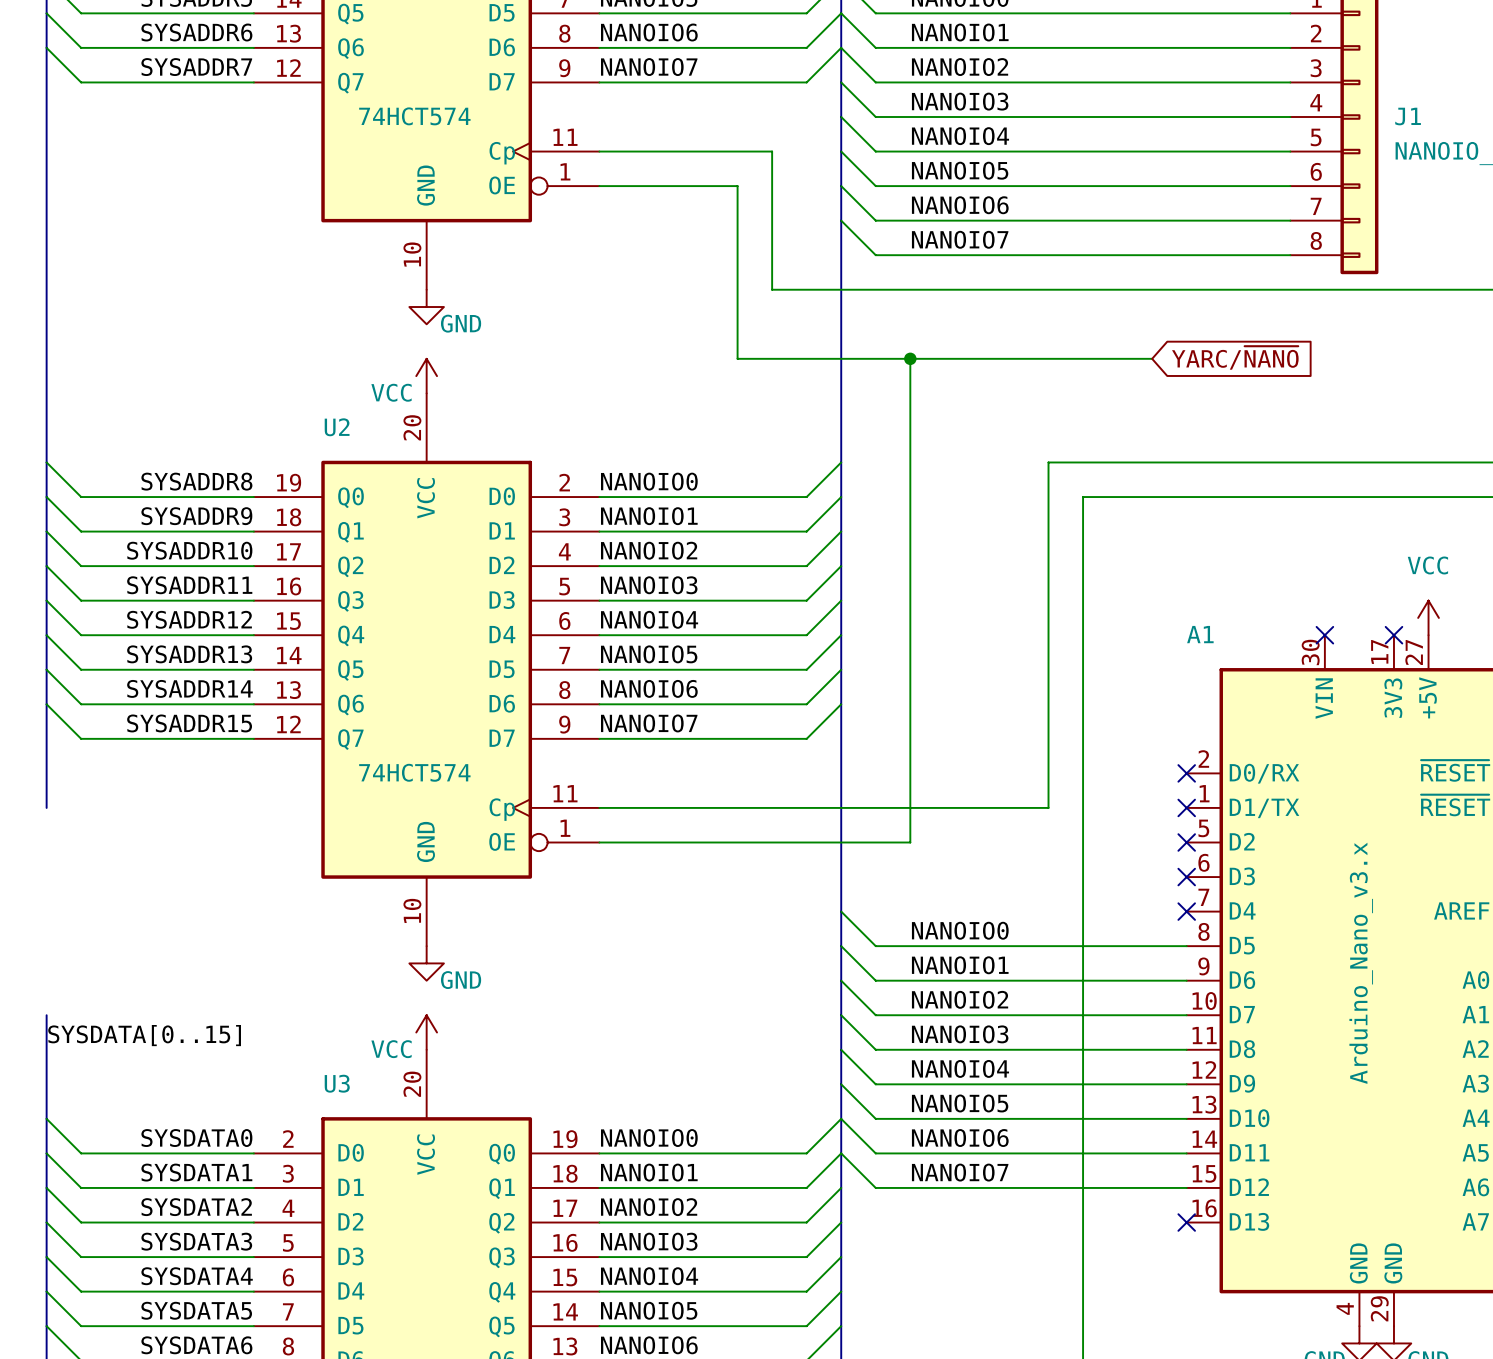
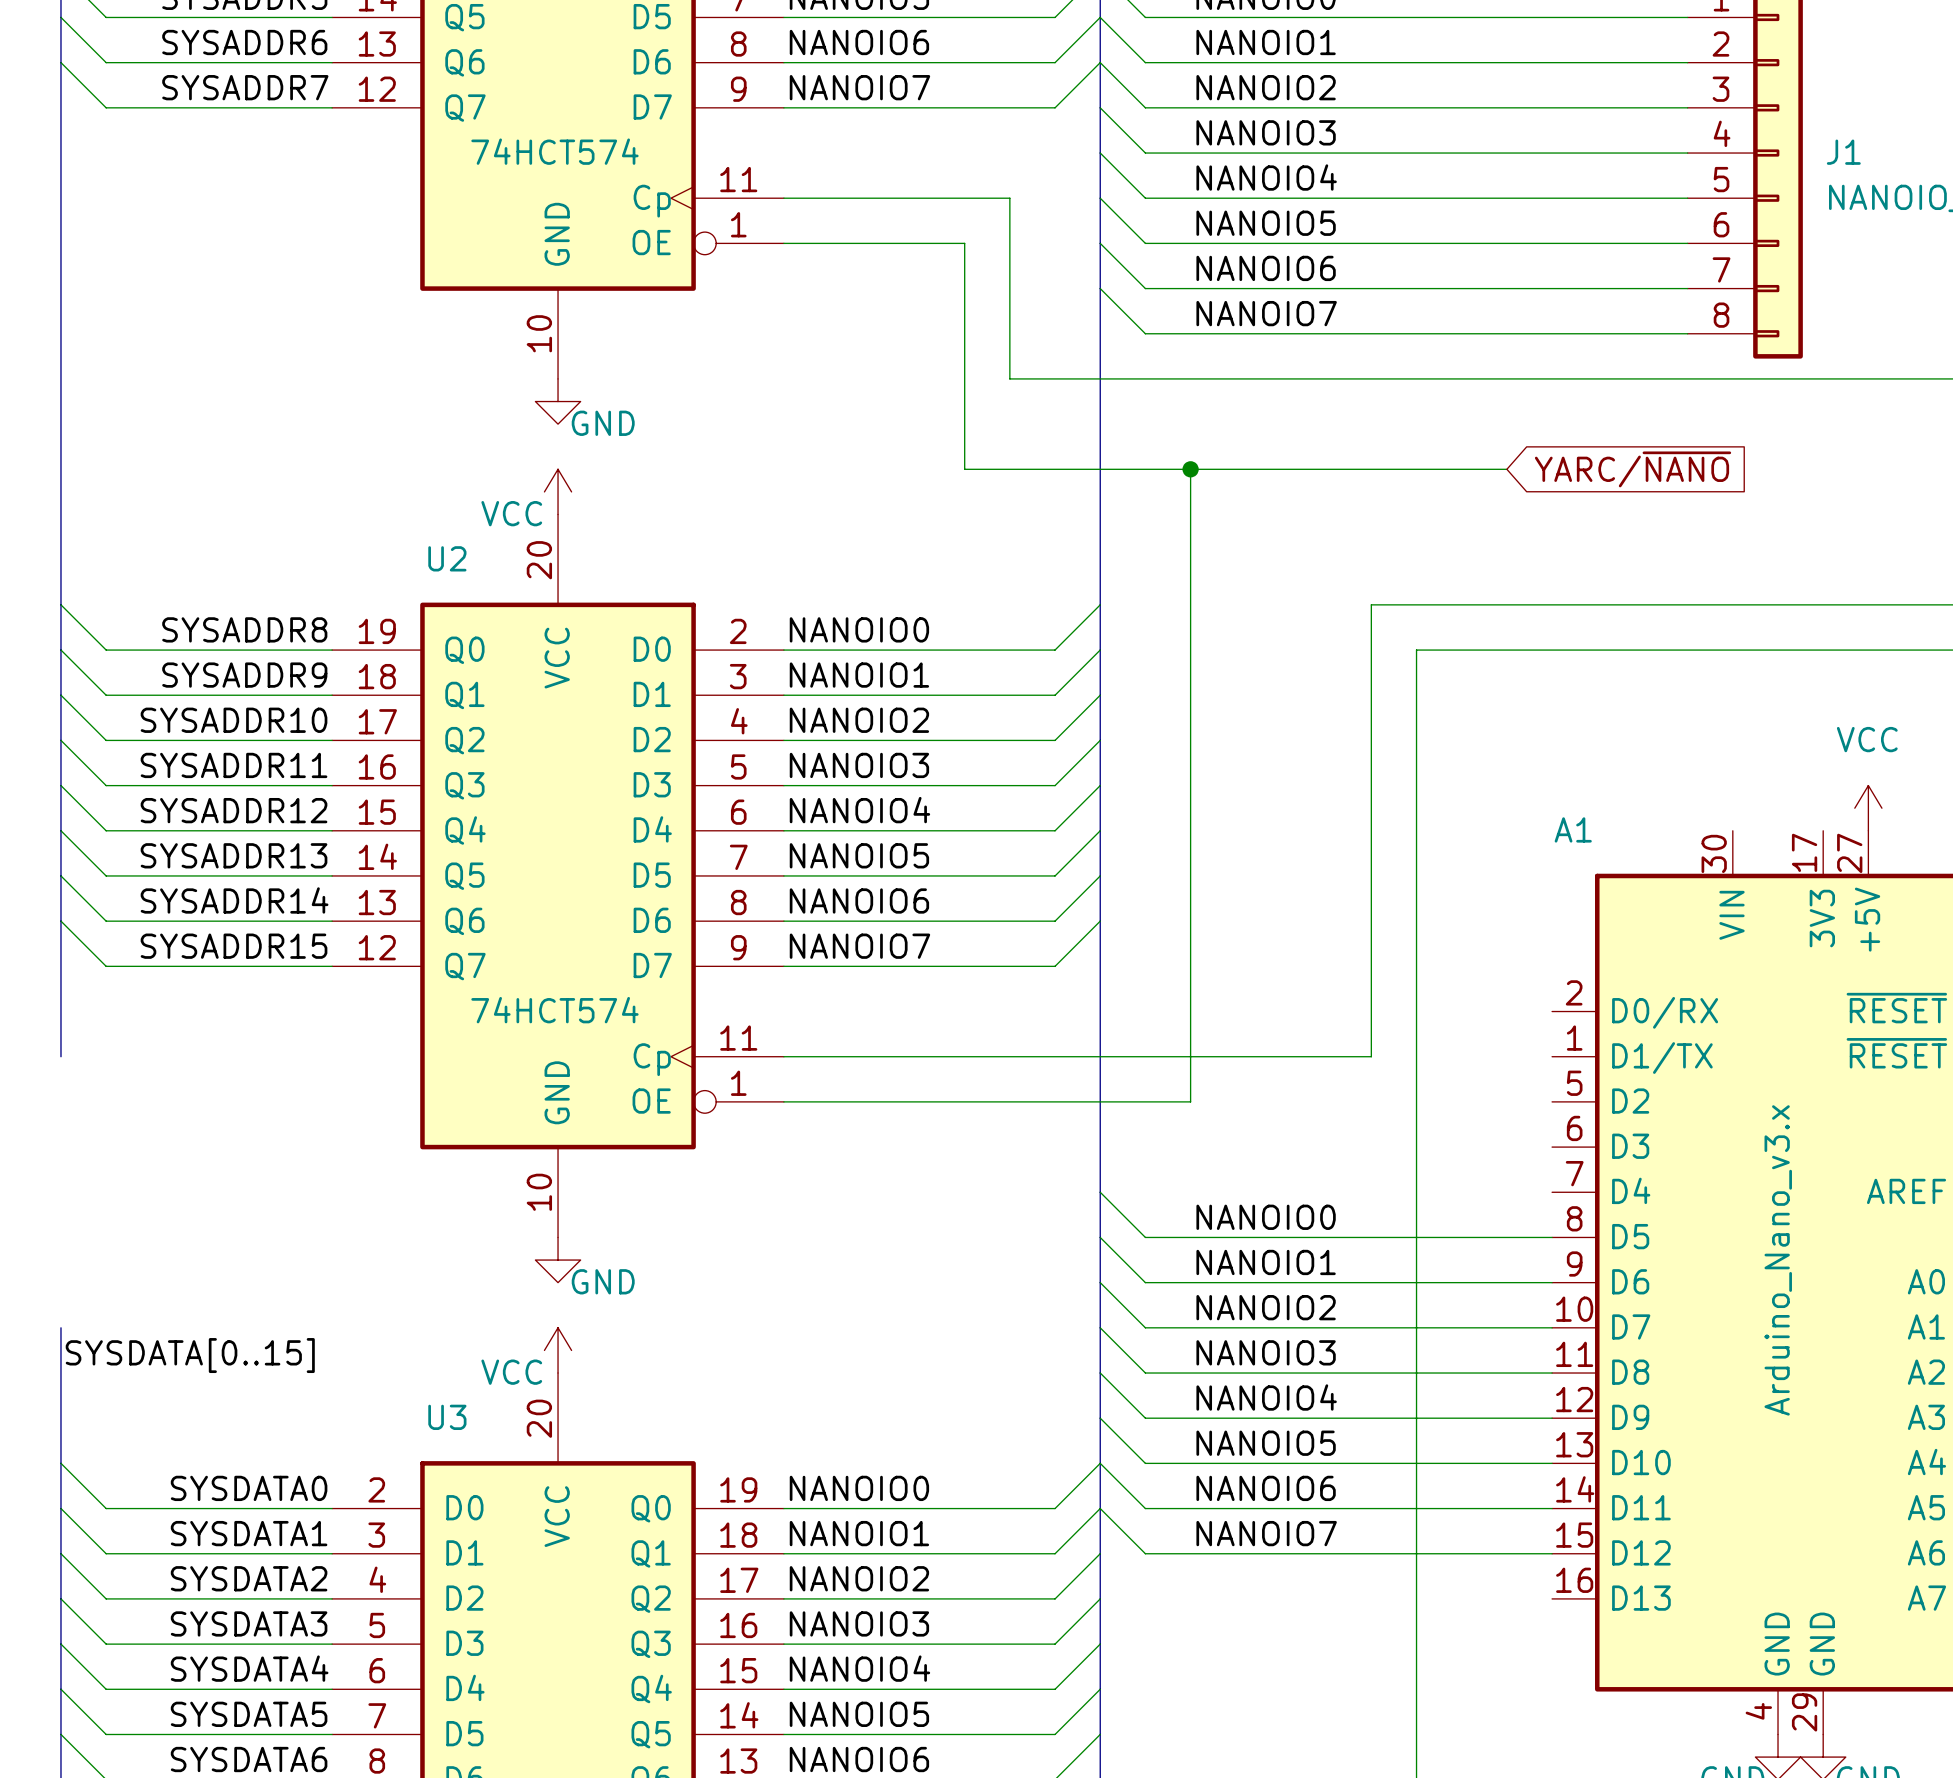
no-connect mark: (1324, 635) -> none
no-connect mark: (1393, 635) -> none
no-connect mark: (1186, 773) -> none
no-connect mark: (1186, 807) -> none
no-connect mark: (1186, 842) -> none
no-connect mark: (1186, 877) -> none
no-connect mark: (1186, 911) -> none
no-connect mark: (1186, 1222) -> none

